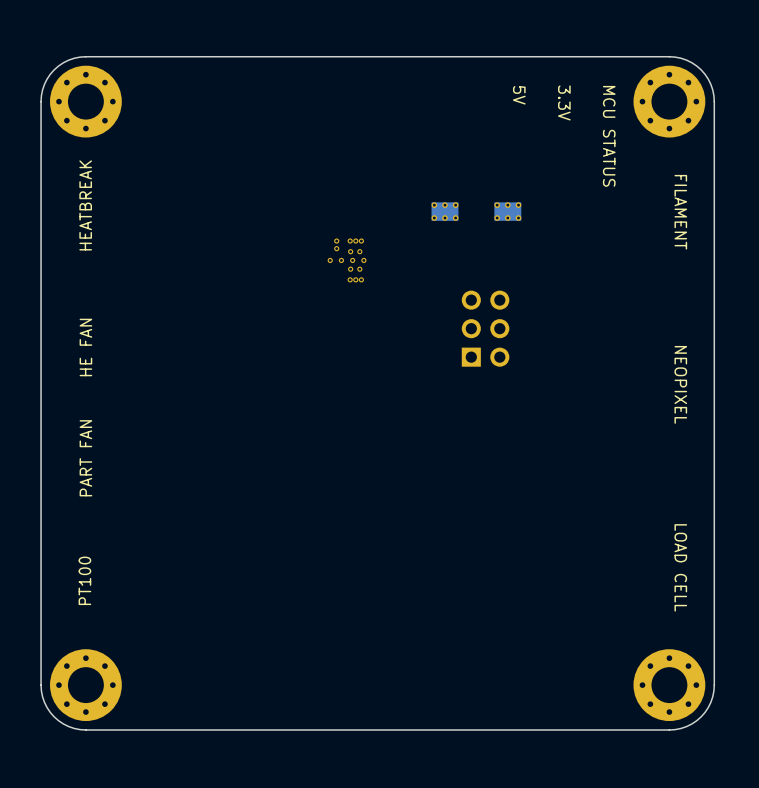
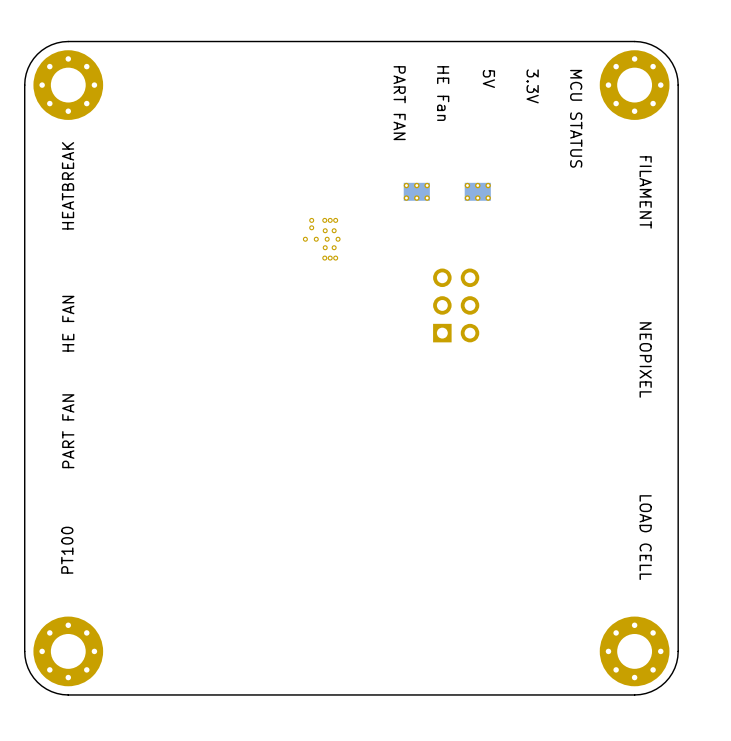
text: none -> HE Fan (443, 93)
text: none -> PART FAN (399, 103)

